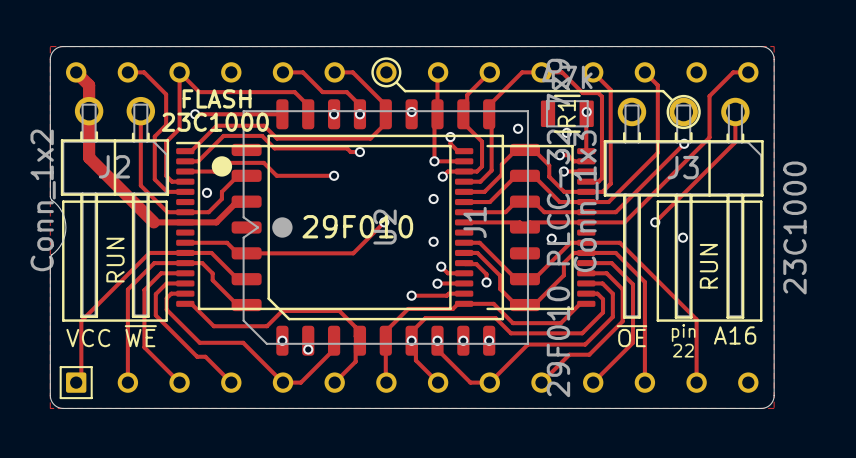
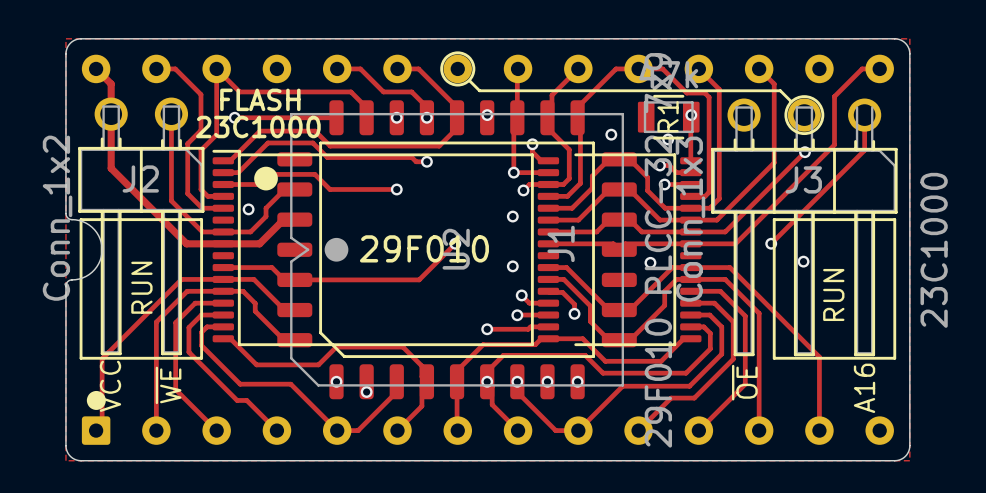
J1 footprint: [50, 46, 775, 409] -> [81, 54, 894, 445]
board edge: none -> (81, 38) (901, 40) (907, 45) (909, 53) (908, 452) (902, 458) (894, 460) (74, 459) (68, 453) (65, 445) (66, 285) (68, 280) (82, 277) (91, 272) (100, 260) (102, 249) (100, 239) (91, 227) (82, 221) (68, 218) (66, 214) (66, 52) (71, 42) (81, 38)
track width: thick (76, 72) (89, 85) (89, 157) (153, 222) -> thin (96, 68) (111, 84) (111, 168) (186, 243)
text: pin (683, 332) -> none
text rotation: 0° (735, 335) -> 90° counterclockwise (864, 388)
text rotation: 0° (140, 336) -> 90° counterclockwise (168, 385)
text rotation: 0° (631, 336) -> 90° counterclockwise (744, 382)
text rotation: 0° (88, 338) -> 90° counterclockwise (110, 386)
drawing: none -> [86, 390, 106, 410]
text: 22 (683, 350) -> none
line: (60, 367) (91, 367) (91, 398) (60, 398) (60, 367) -> none

